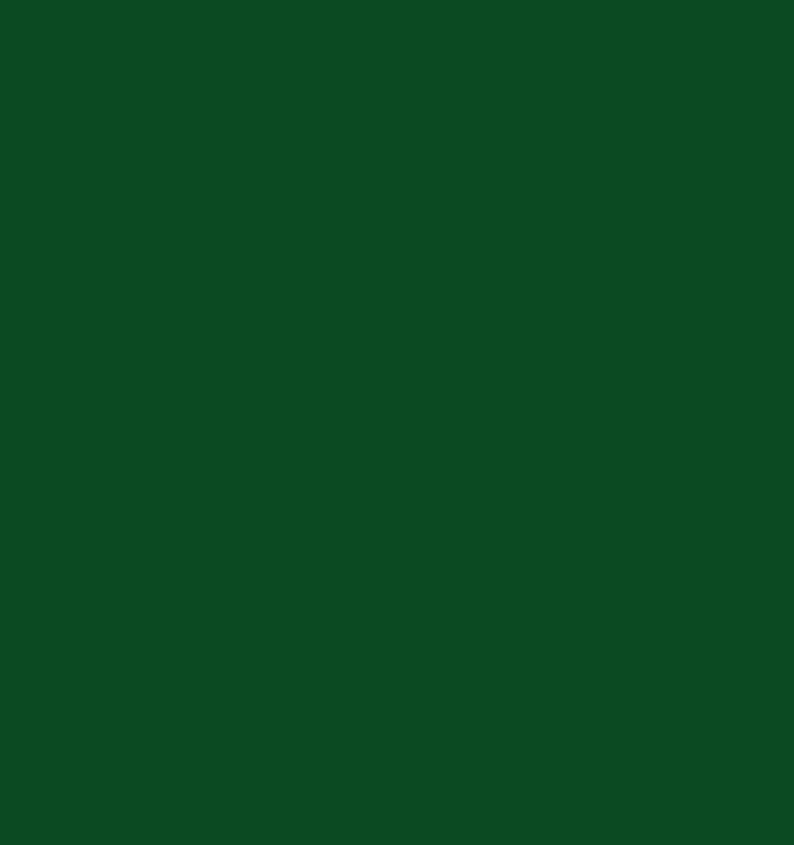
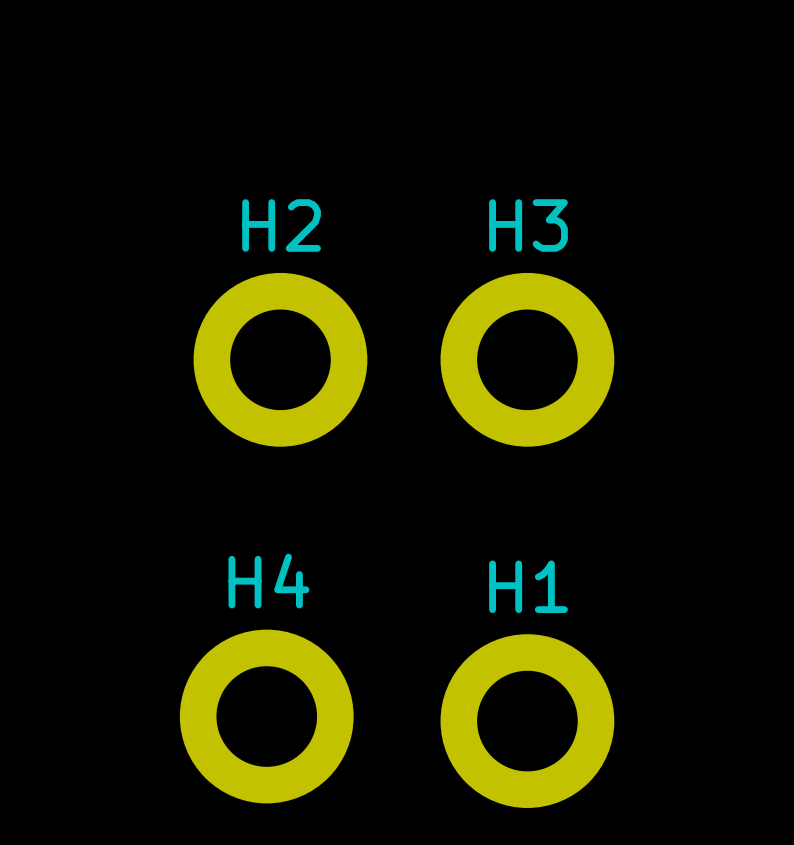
H2: none -> (280, 359)
H3: none -> (527, 359)
H4: none -> (266, 716)
H1: none -> (527, 721)

